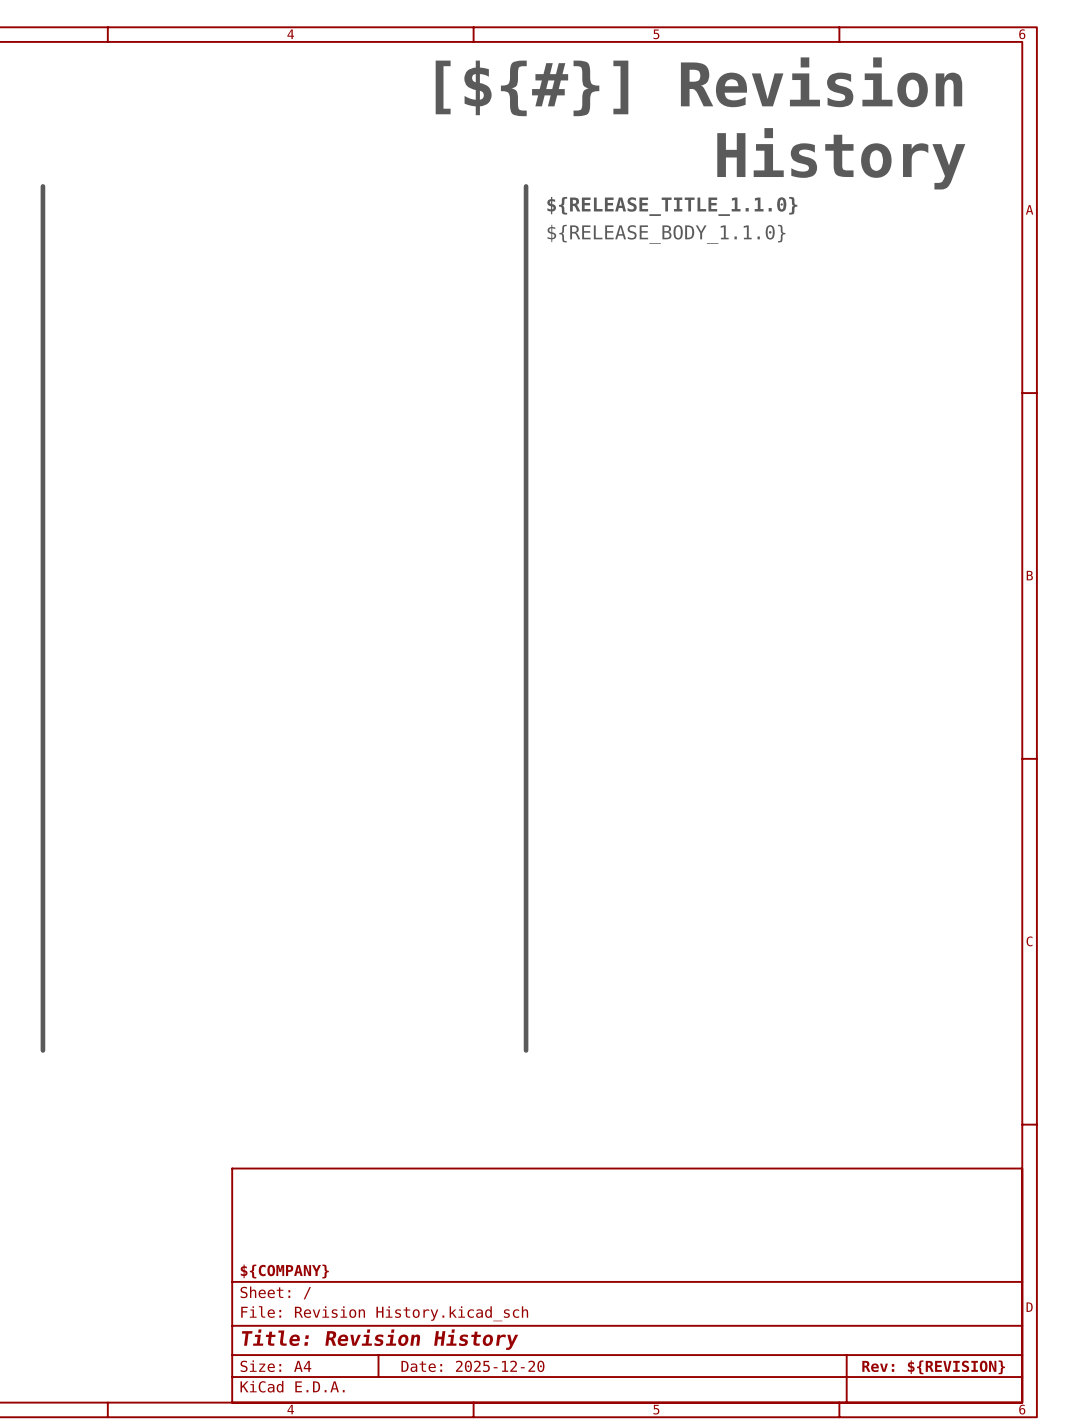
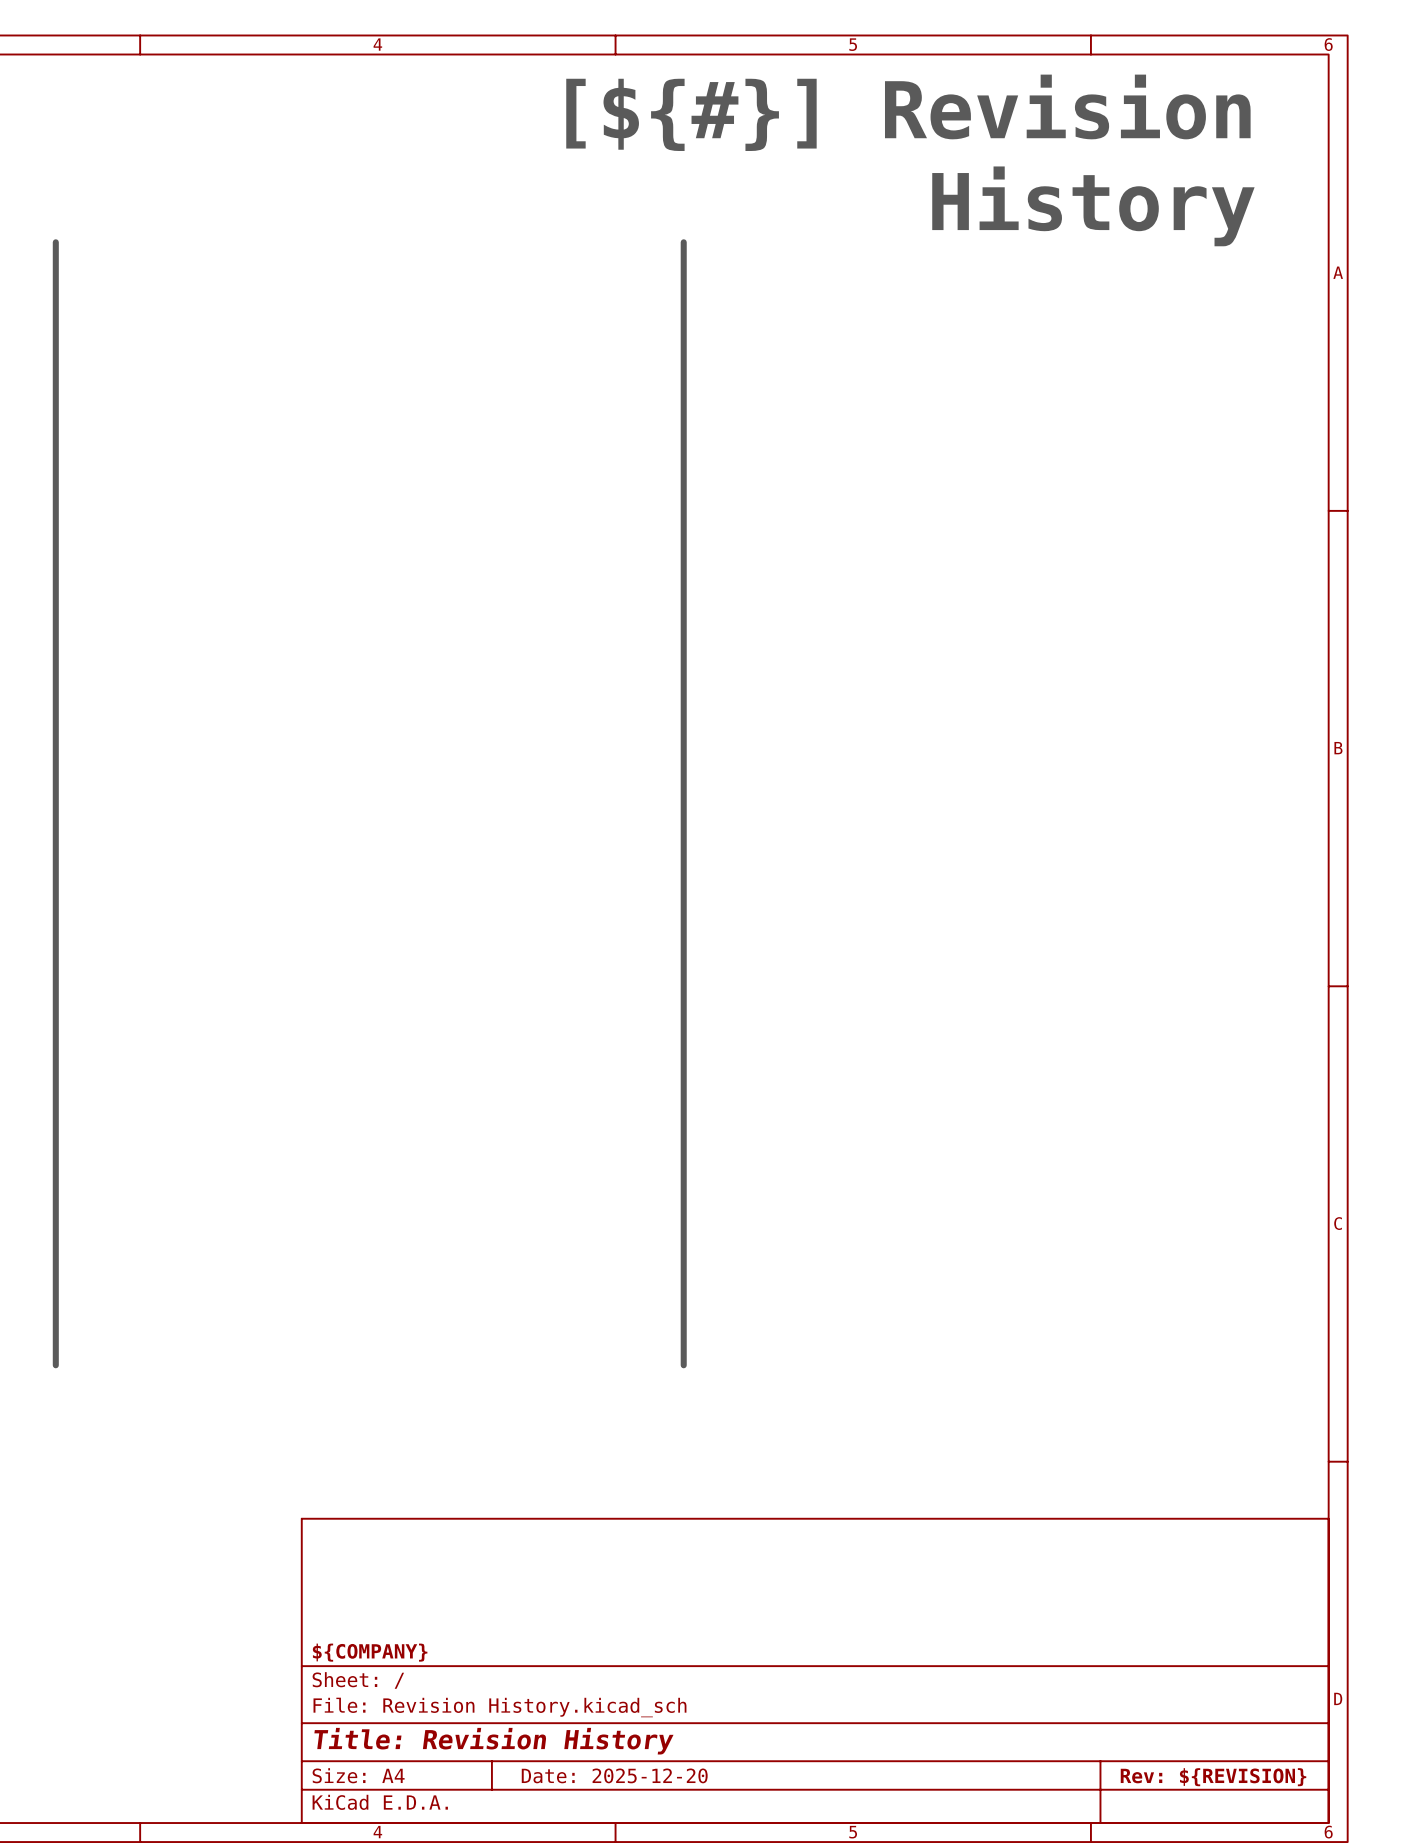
text: ${RELEASE_TITLE_1.1.0} (672, 206) -> none
text: ${RELEASE_BODY_1.1.0} (666, 234) -> none

